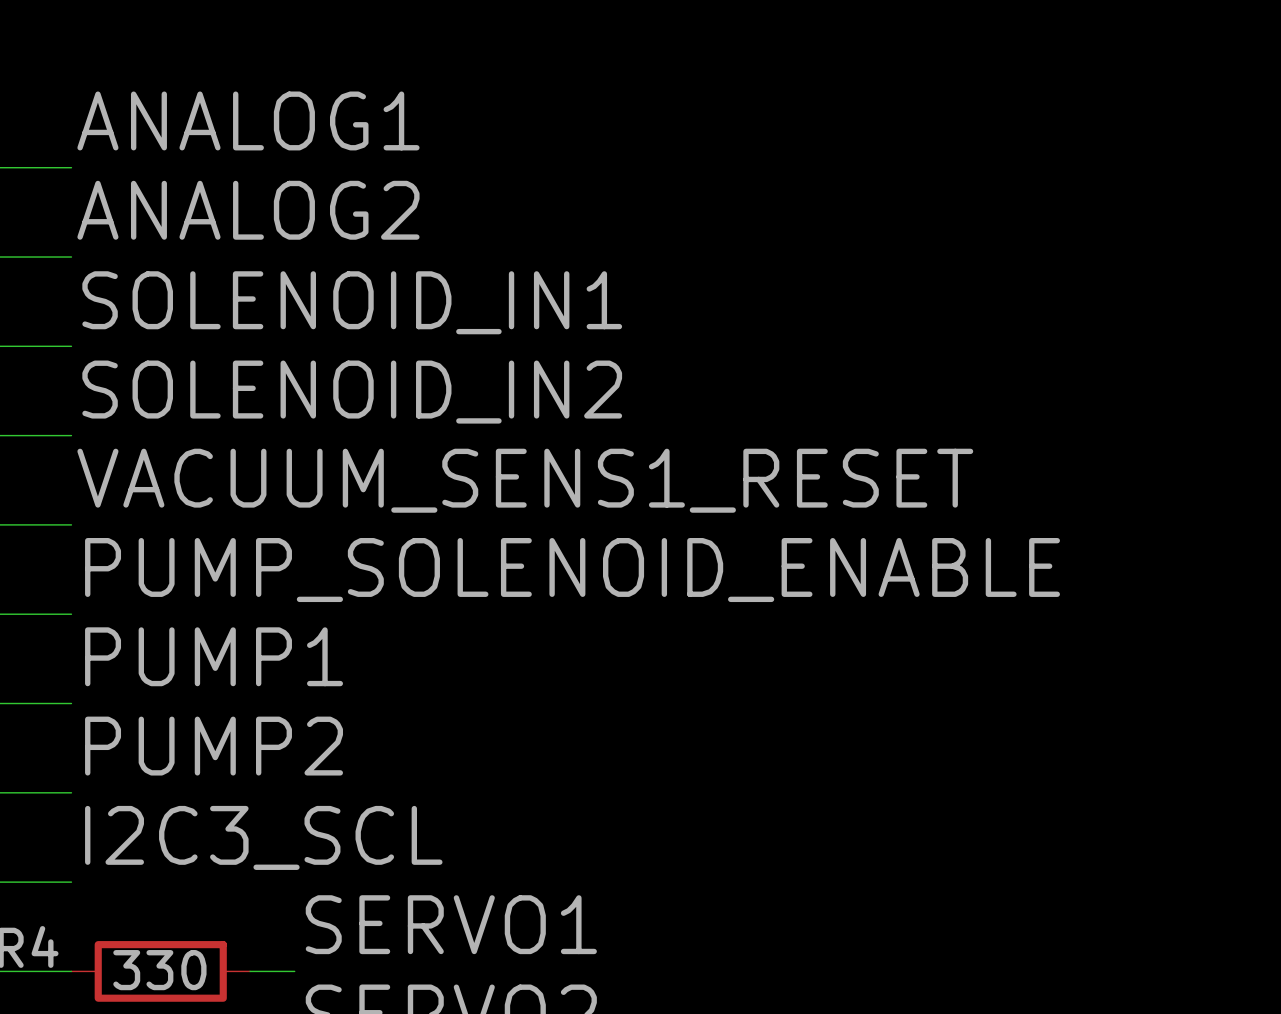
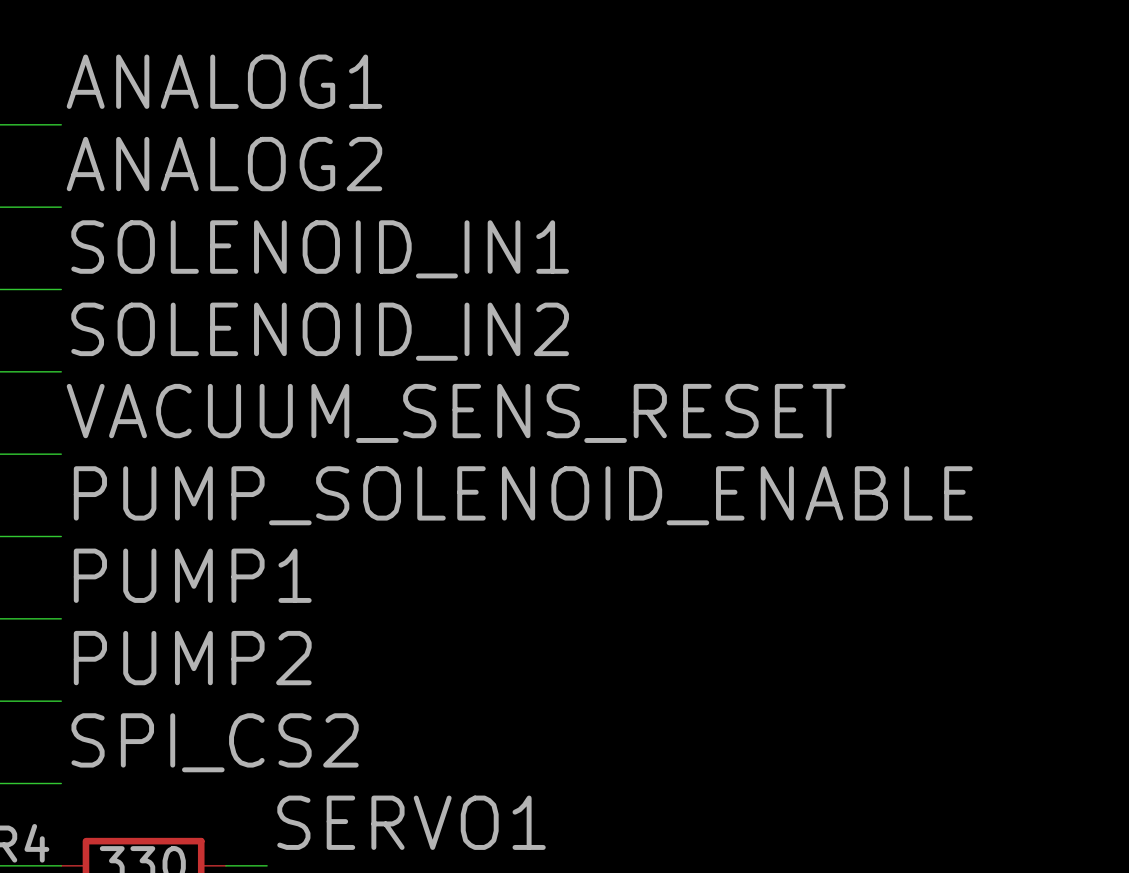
label: VACUUM_SENS1_RESET (525, 480) -> VACUUM_SENS_RESET (456, 413)
label: I2C3_SCL (263, 837) -> SPI_CS2 (215, 742)

